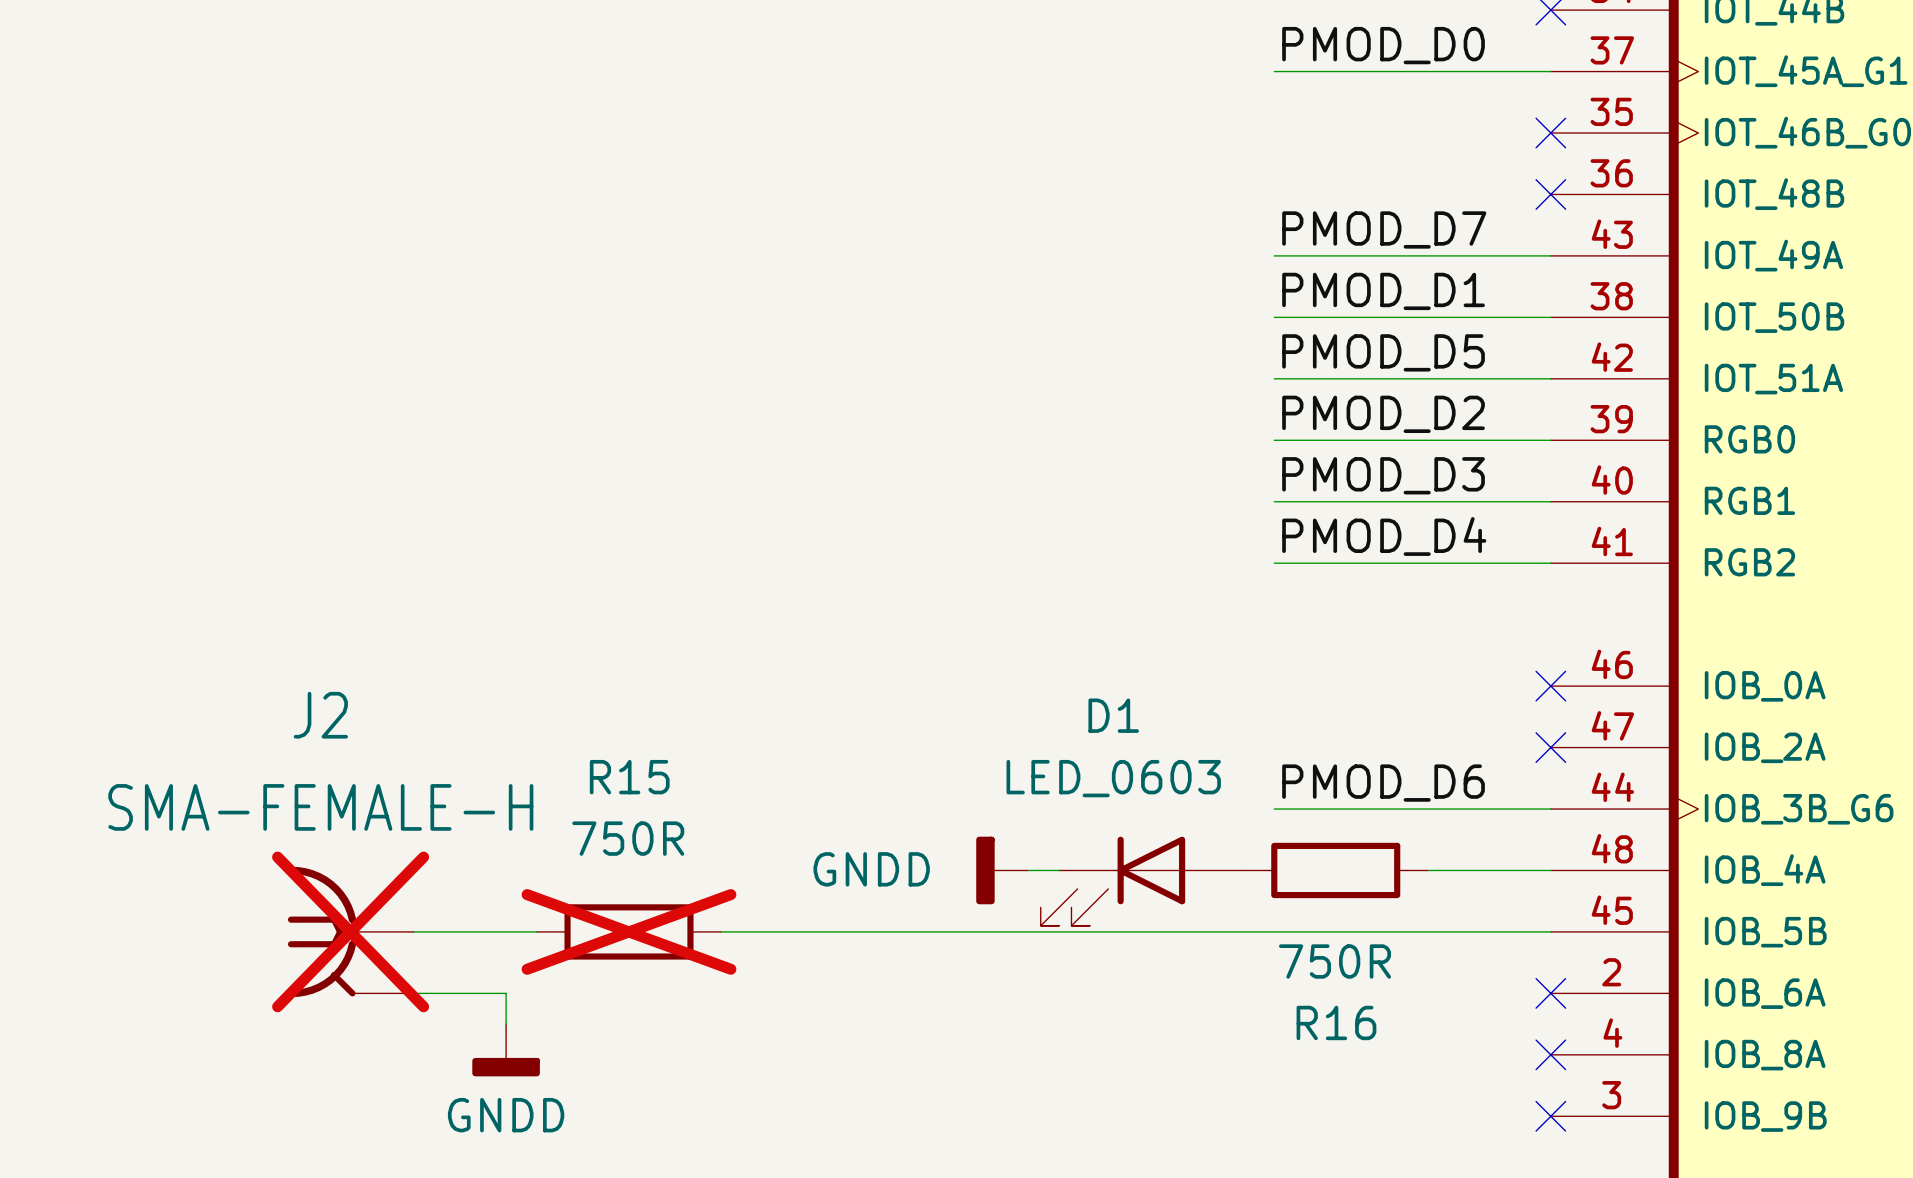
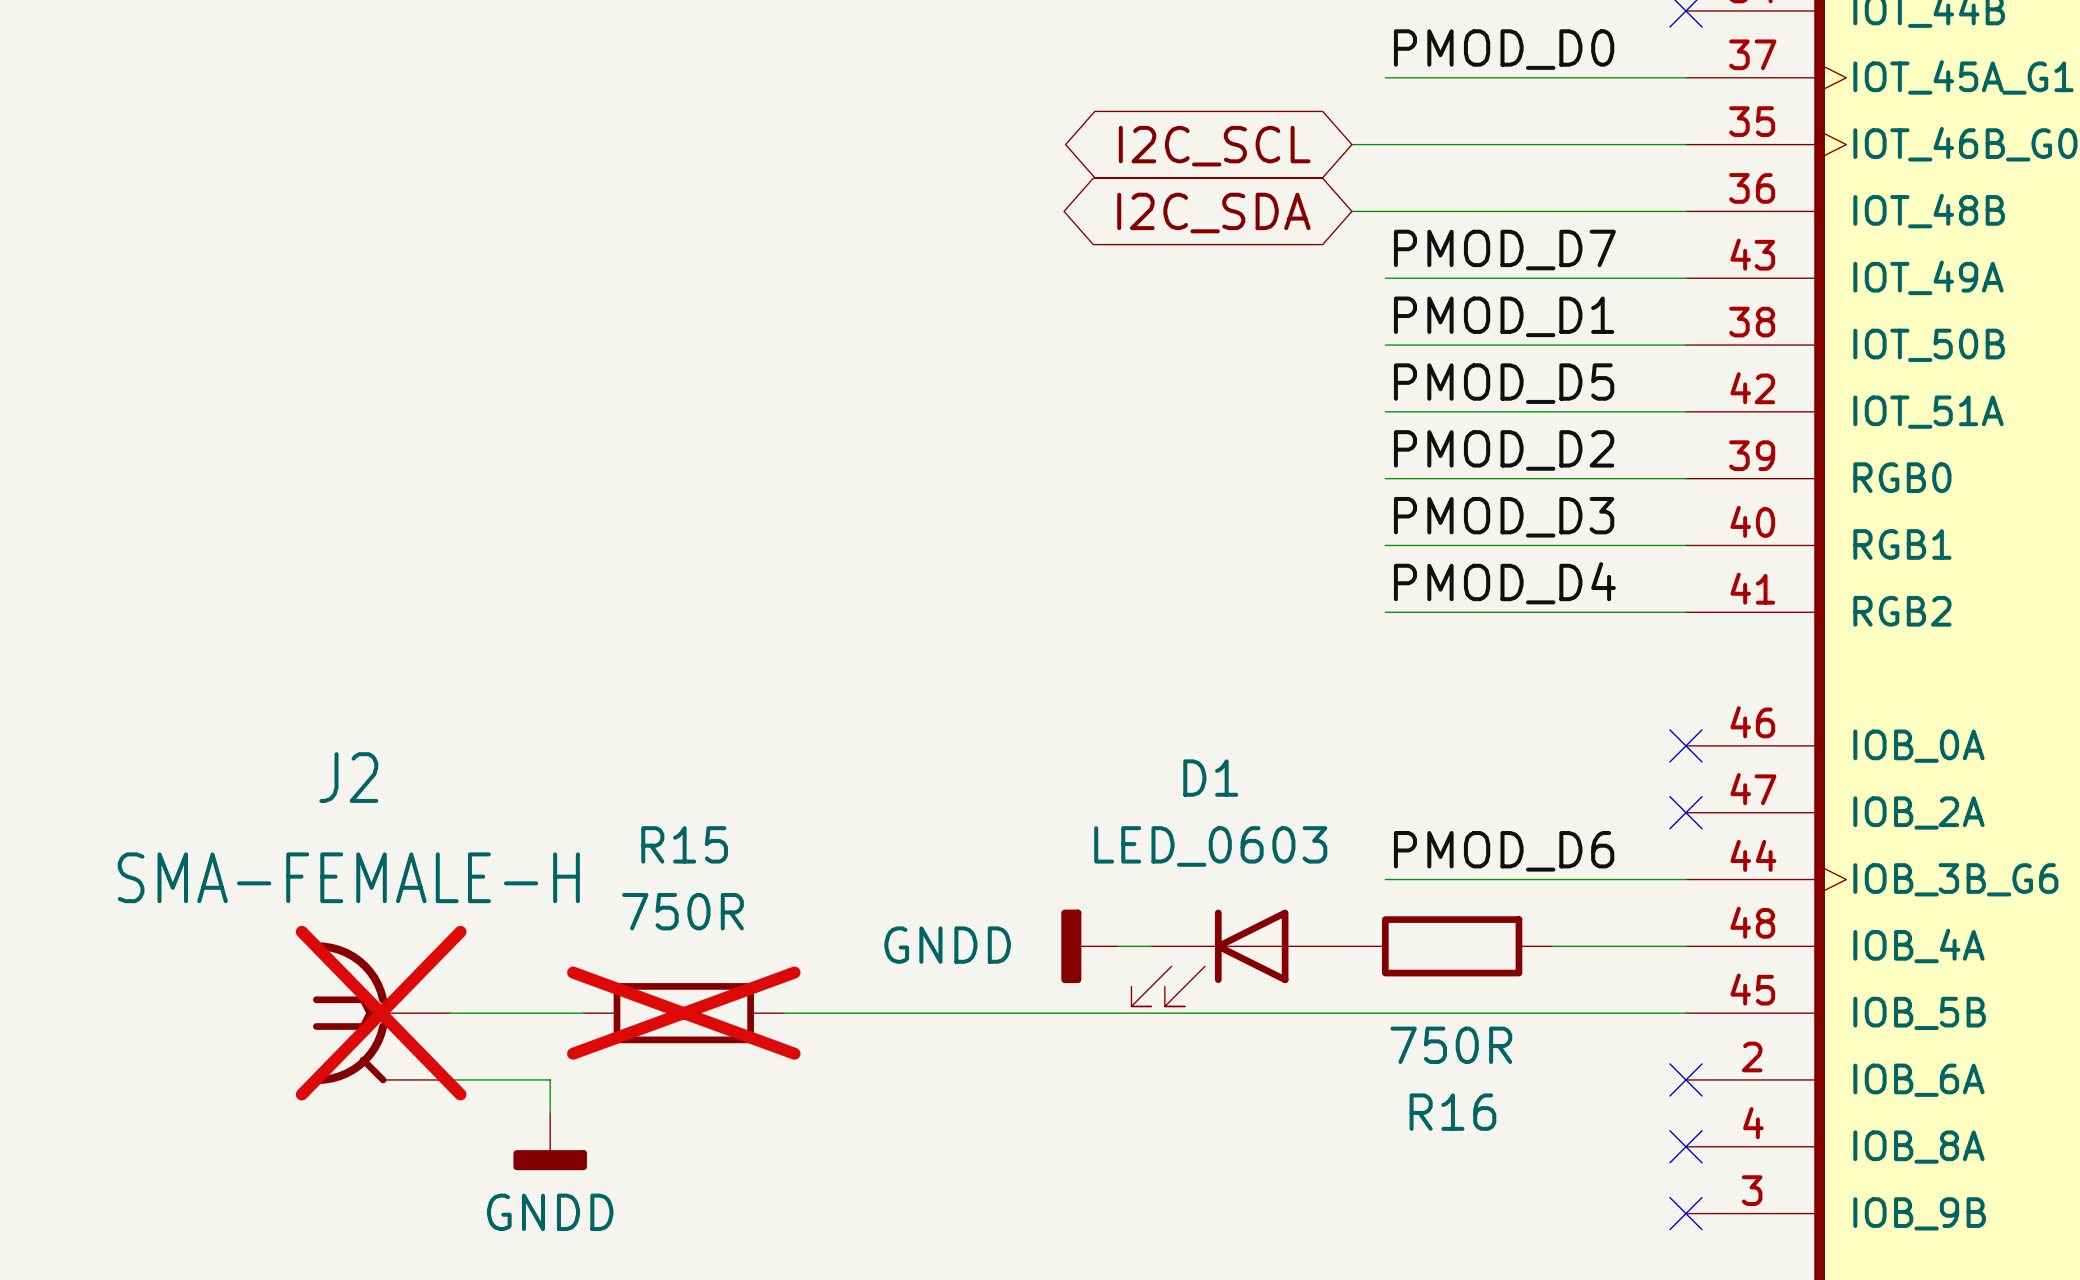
wire: none -> (1351, 144) (1685, 144)
no-connect mark: (1550, 133) -> none
global label: none -> I2C_SCL (1214, 146)
wire: none -> (1351, 211) (1685, 211)
no-connect mark: (1550, 194) -> none
global label: none -> I2C_SDA (1213, 213)

